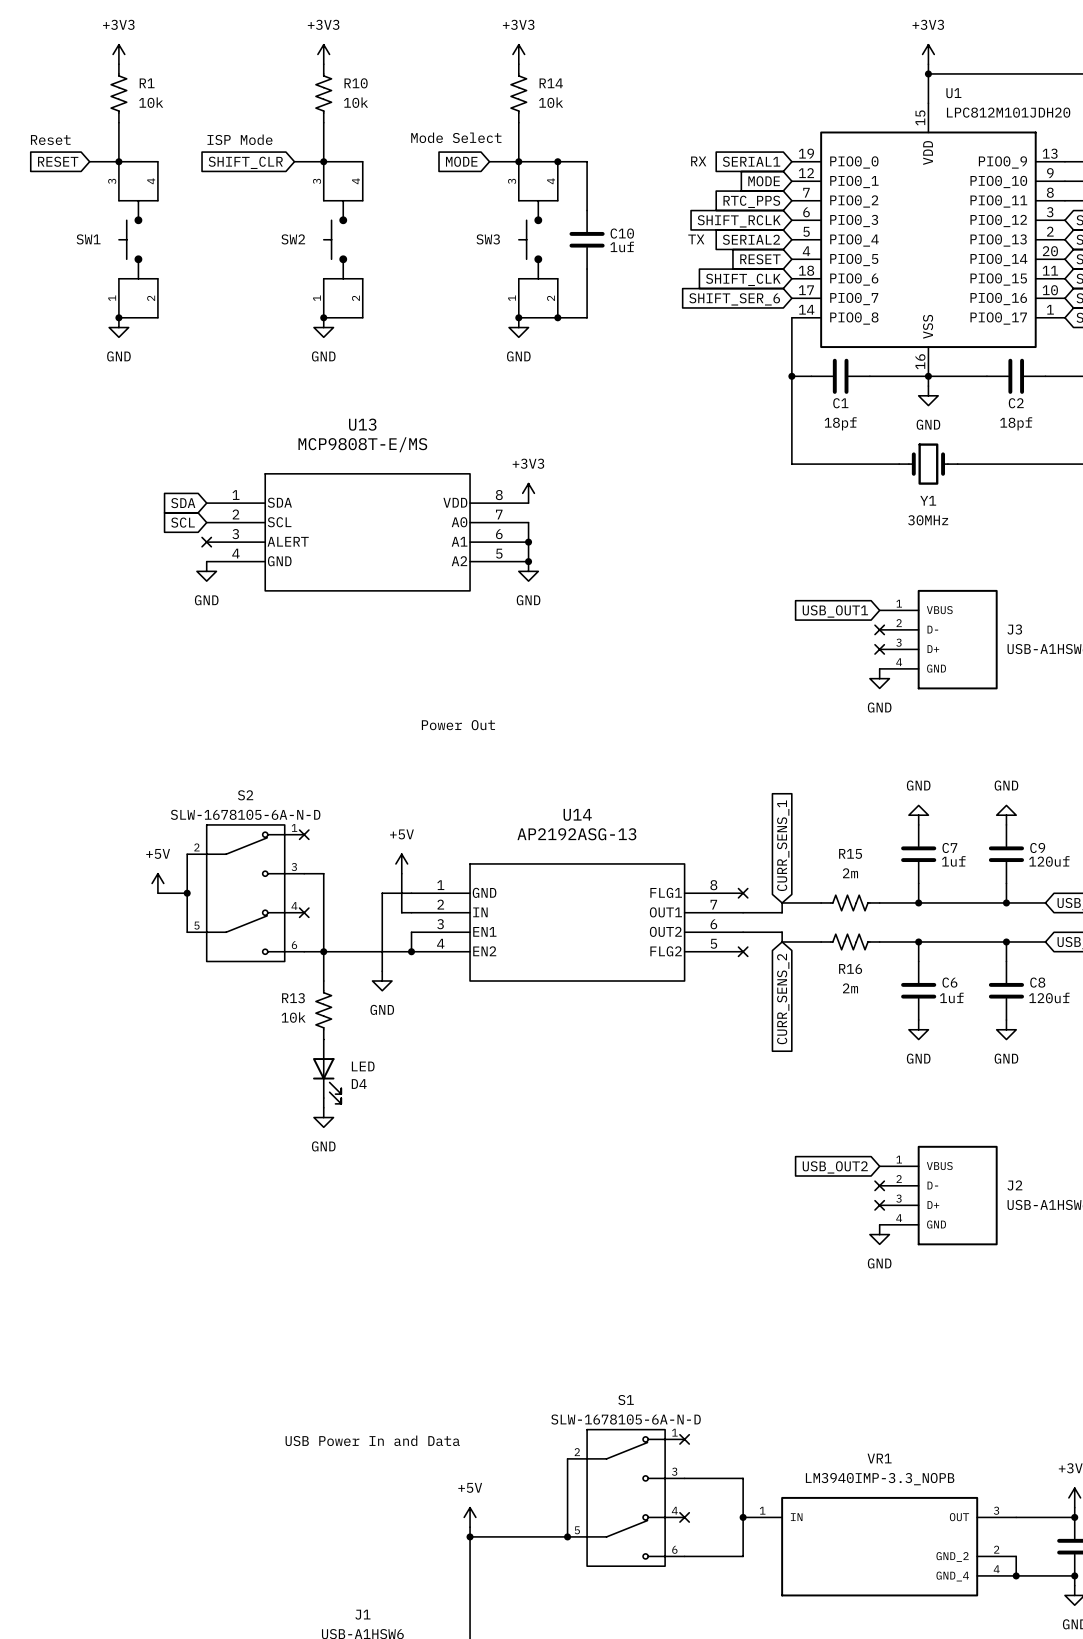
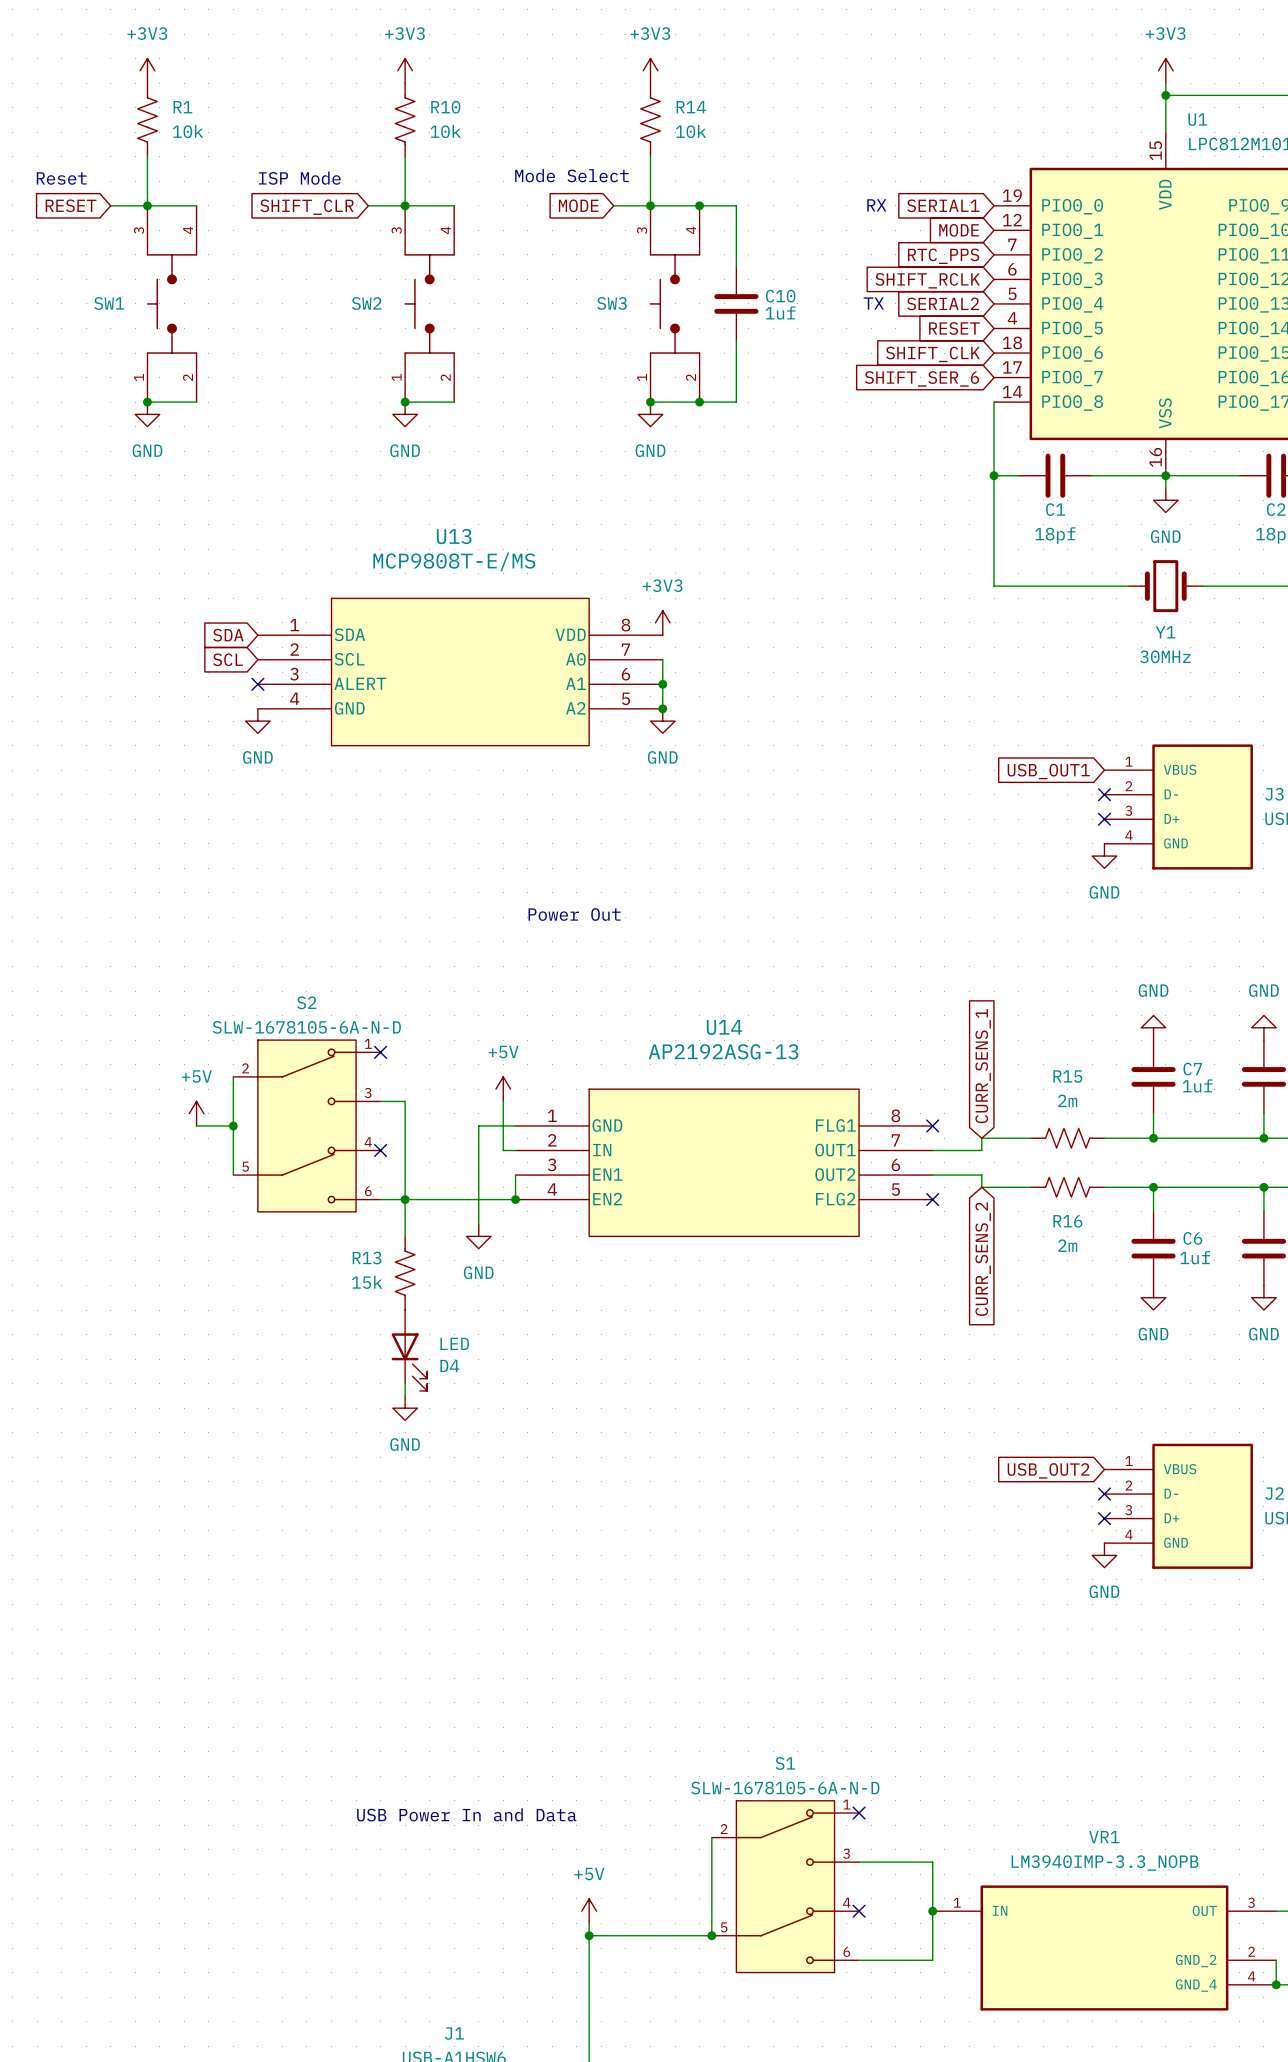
R13 value: 10k (293, 1017) -> 15k (367, 1282)

